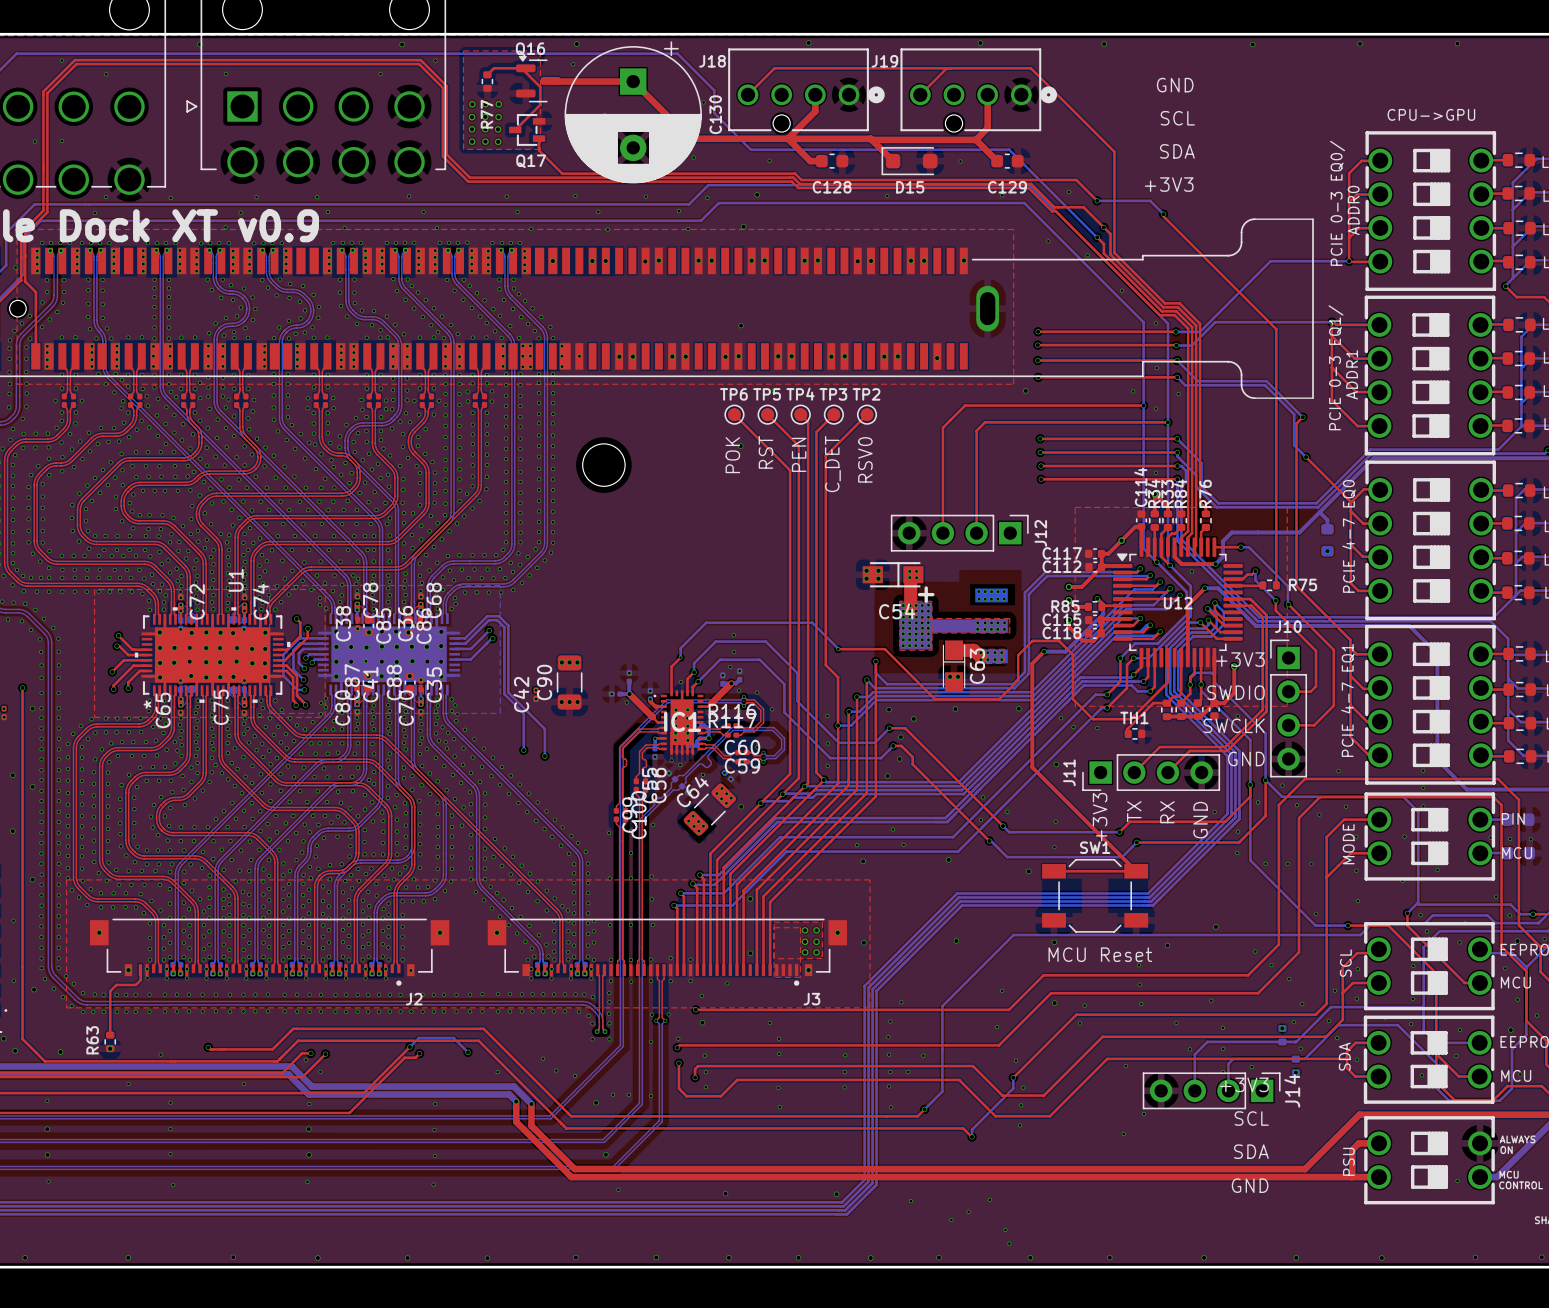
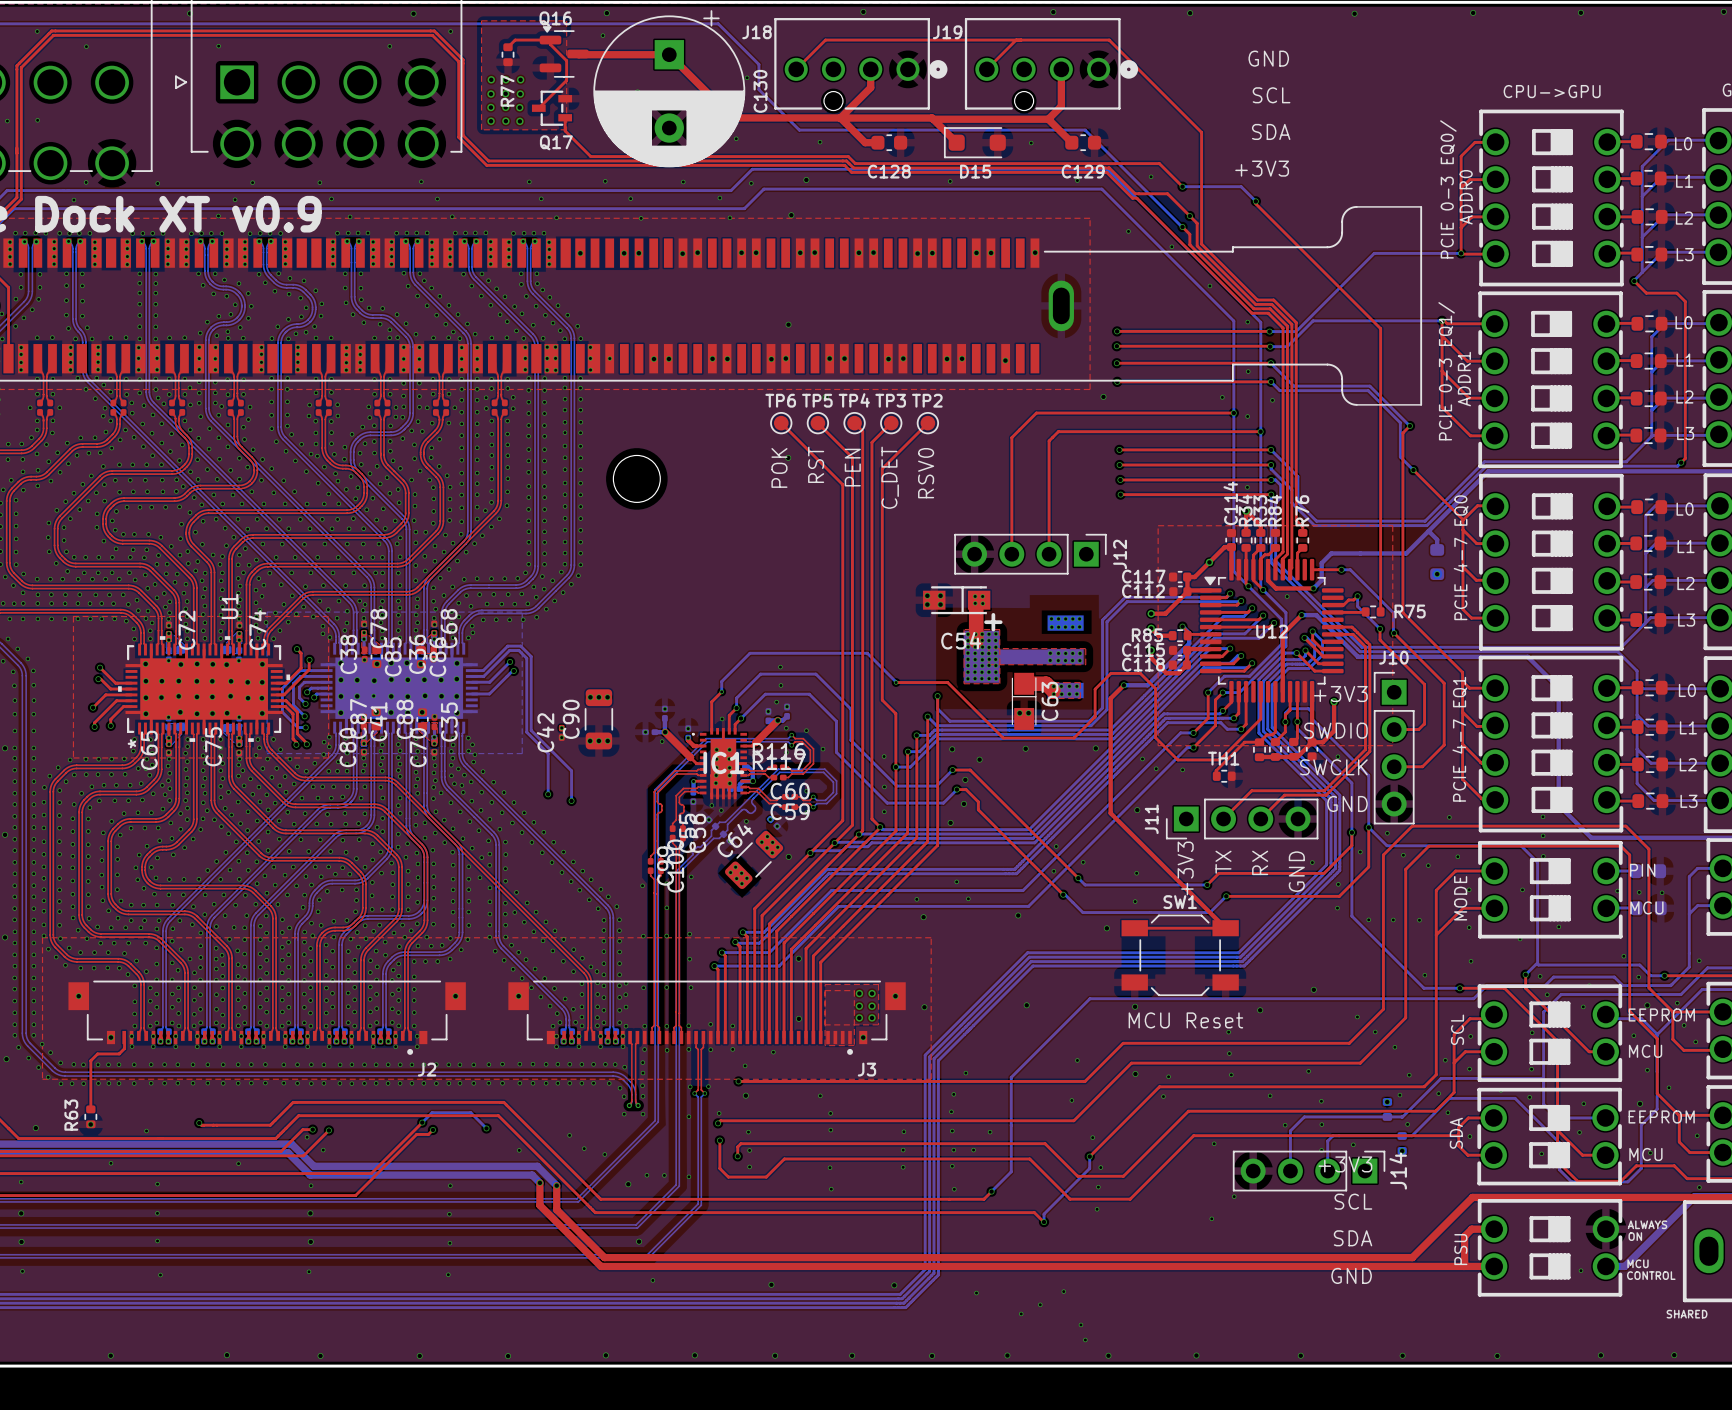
via: none -> (417, 1036)
via: (410, 970) -> none
via: none -> (417, 1046)

